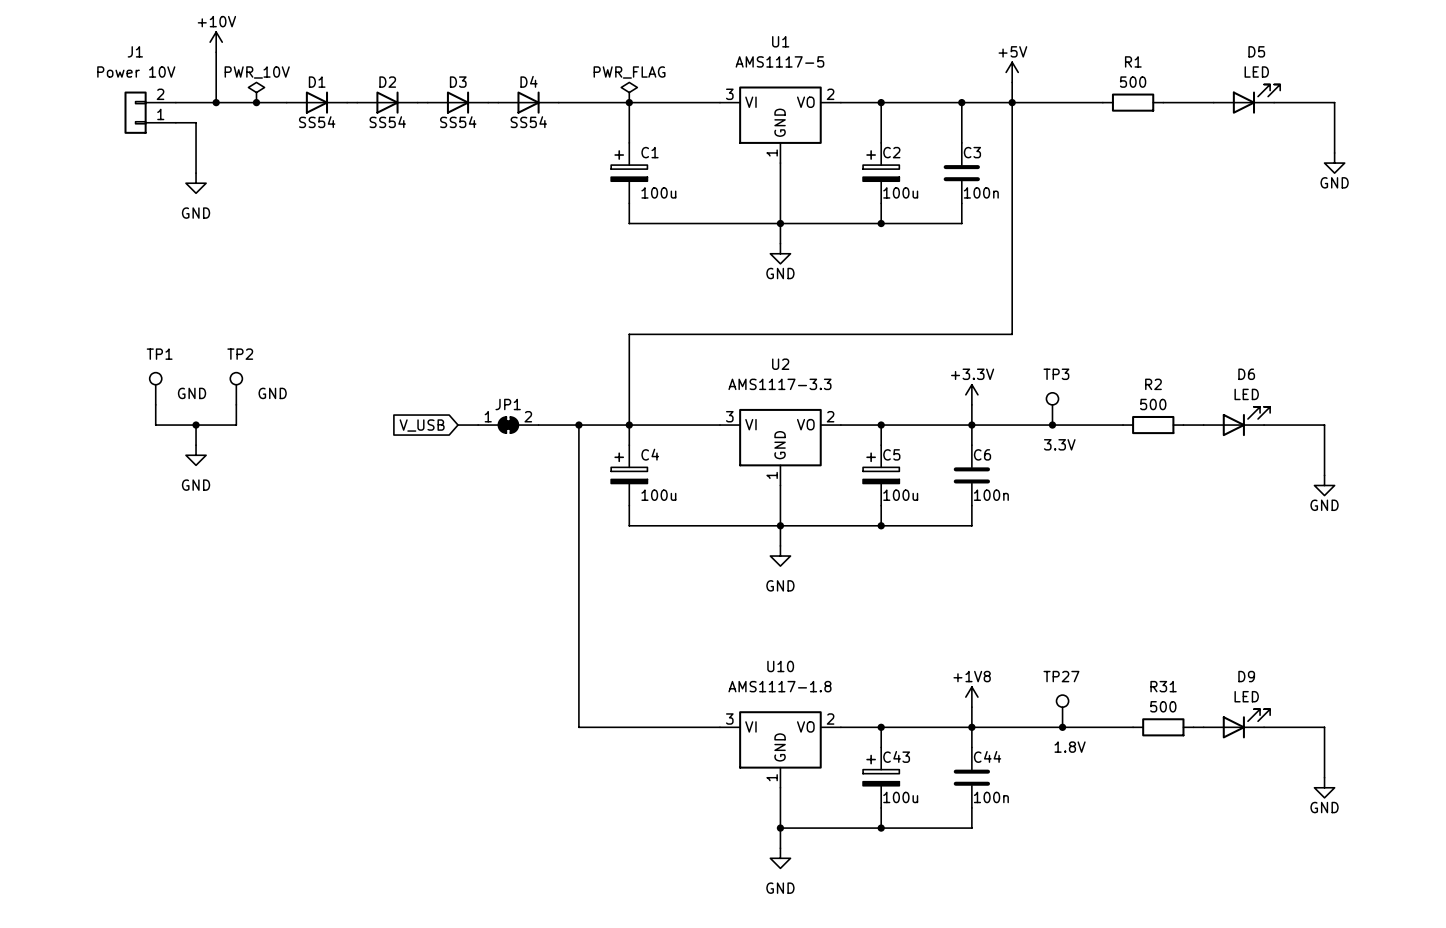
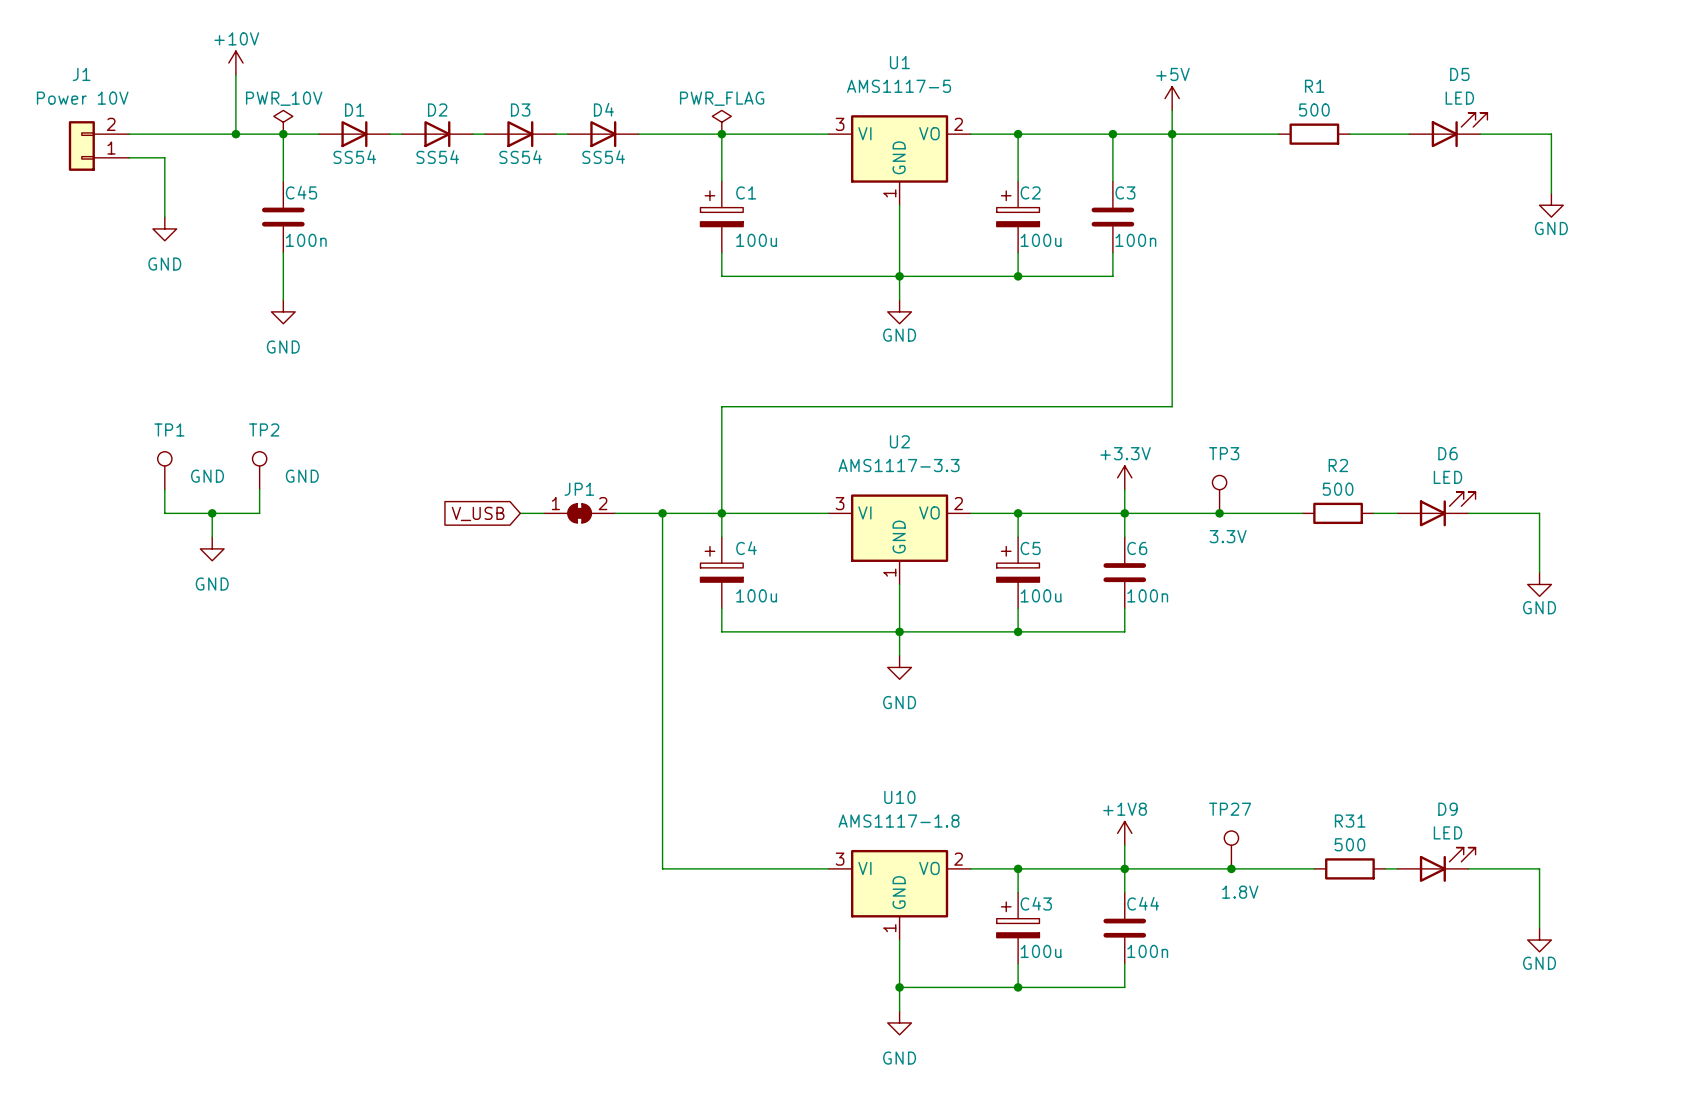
wire: none -> (283, 134) (283, 181)
J1 position: (150, 112) -> (99, 145)
wire: none -> (129, 157) (164, 157) (164, 217)
wire: (175, 122) (196, 122) (196, 173) -> none
C45: none -> 100n (283, 217)
power symbol position: GND (196, 183) -> GND (164, 228)
wire: none -> (283, 252) (283, 300)
power symbol: none -> GND (283, 311)

